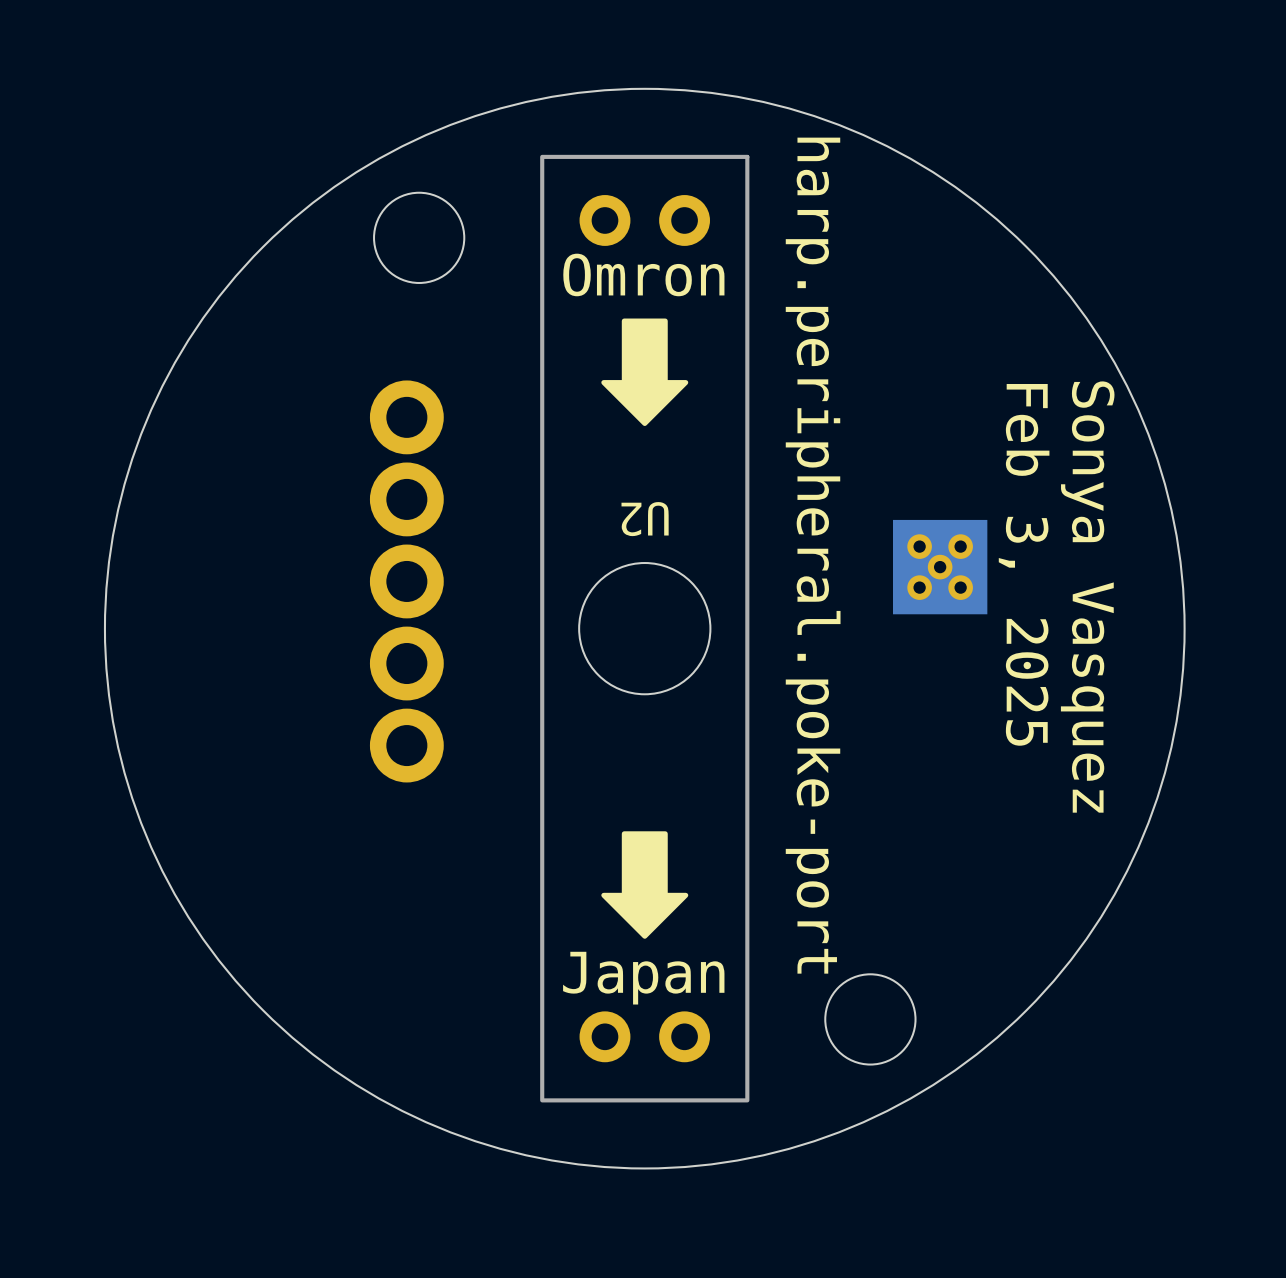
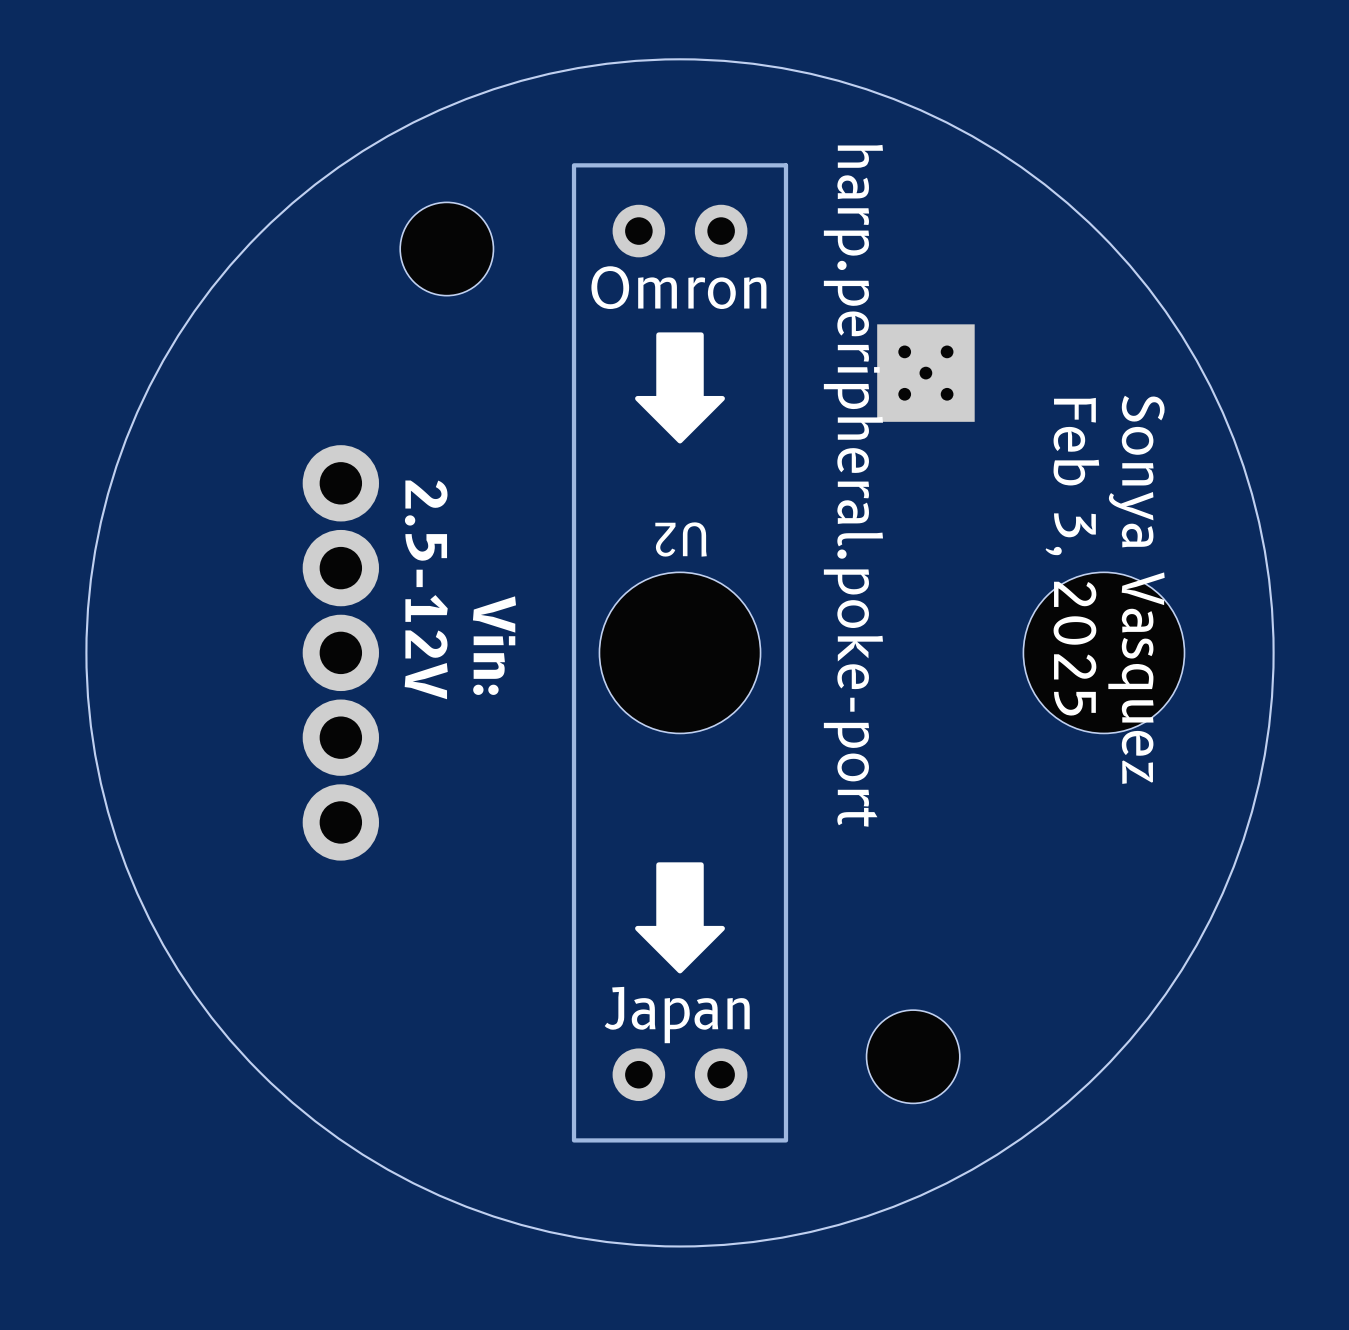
round board edge size: [103, 87, 1186, 1170] -> [85, 58, 1275, 1248]
U2 footprint: [540, 154, 750, 1103] -> [571, 163, 789, 1143]
text: none -> 2.5-12V (426, 589)
part position: (940, 567) -> (925, 373)
part position: (406, 581) -> (340, 652)
text: none -> Vin: (494, 645)
part: none -> (1103, 652)

